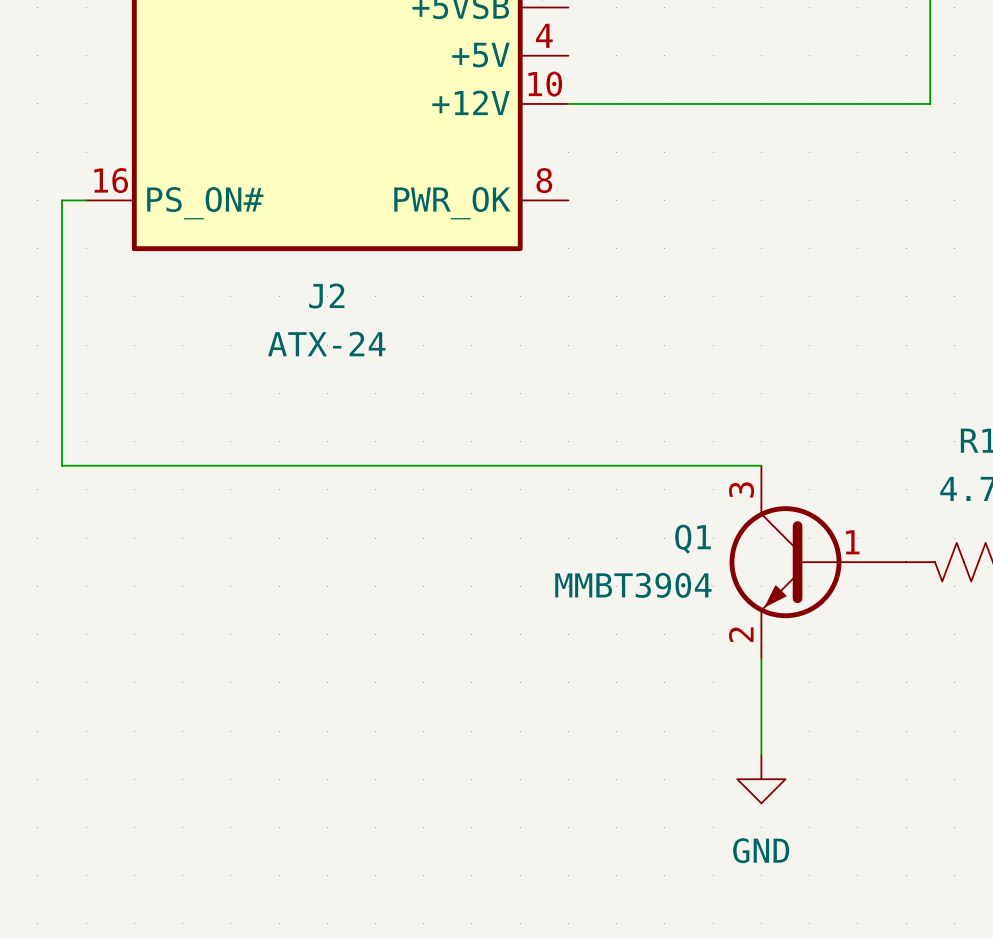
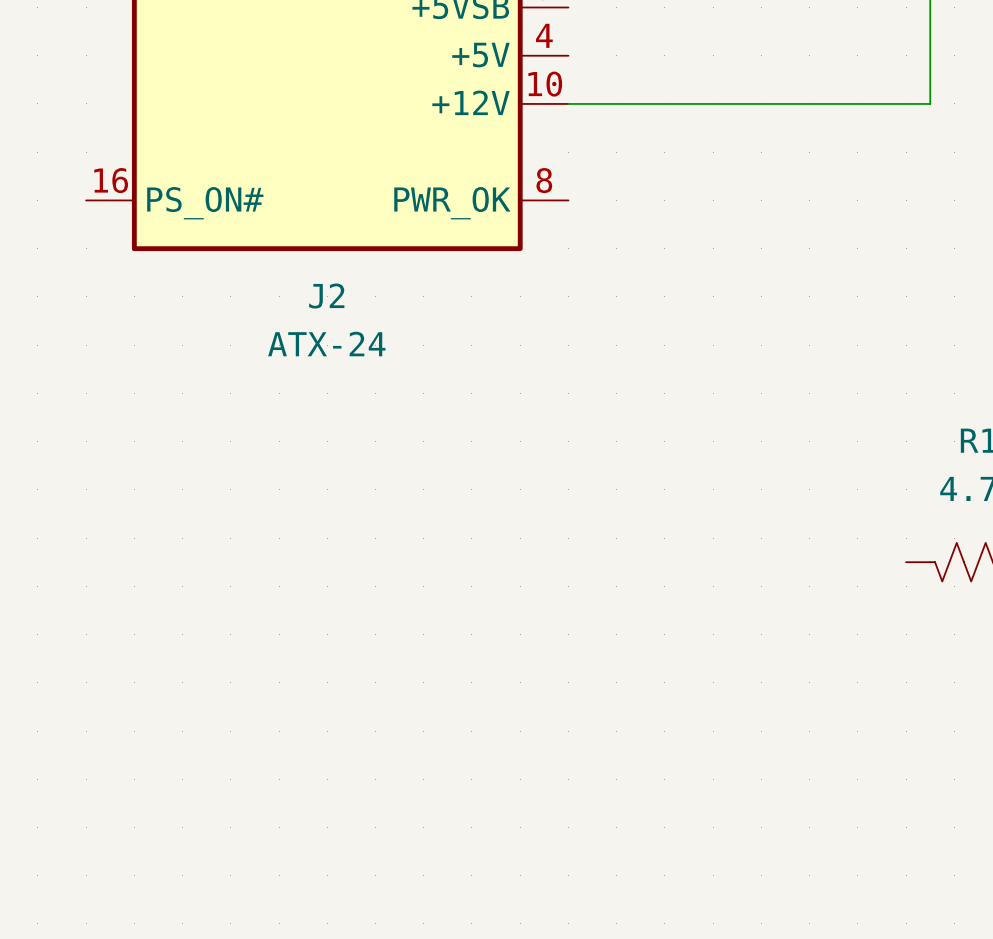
wire: (86, 200) (62, 200) (62, 465) (761, 465) -> none
Q1: MMBT3904 (817, 562) -> none
wire: (761, 658) (761, 755) -> none
power symbol: GND (761, 779) -> none

